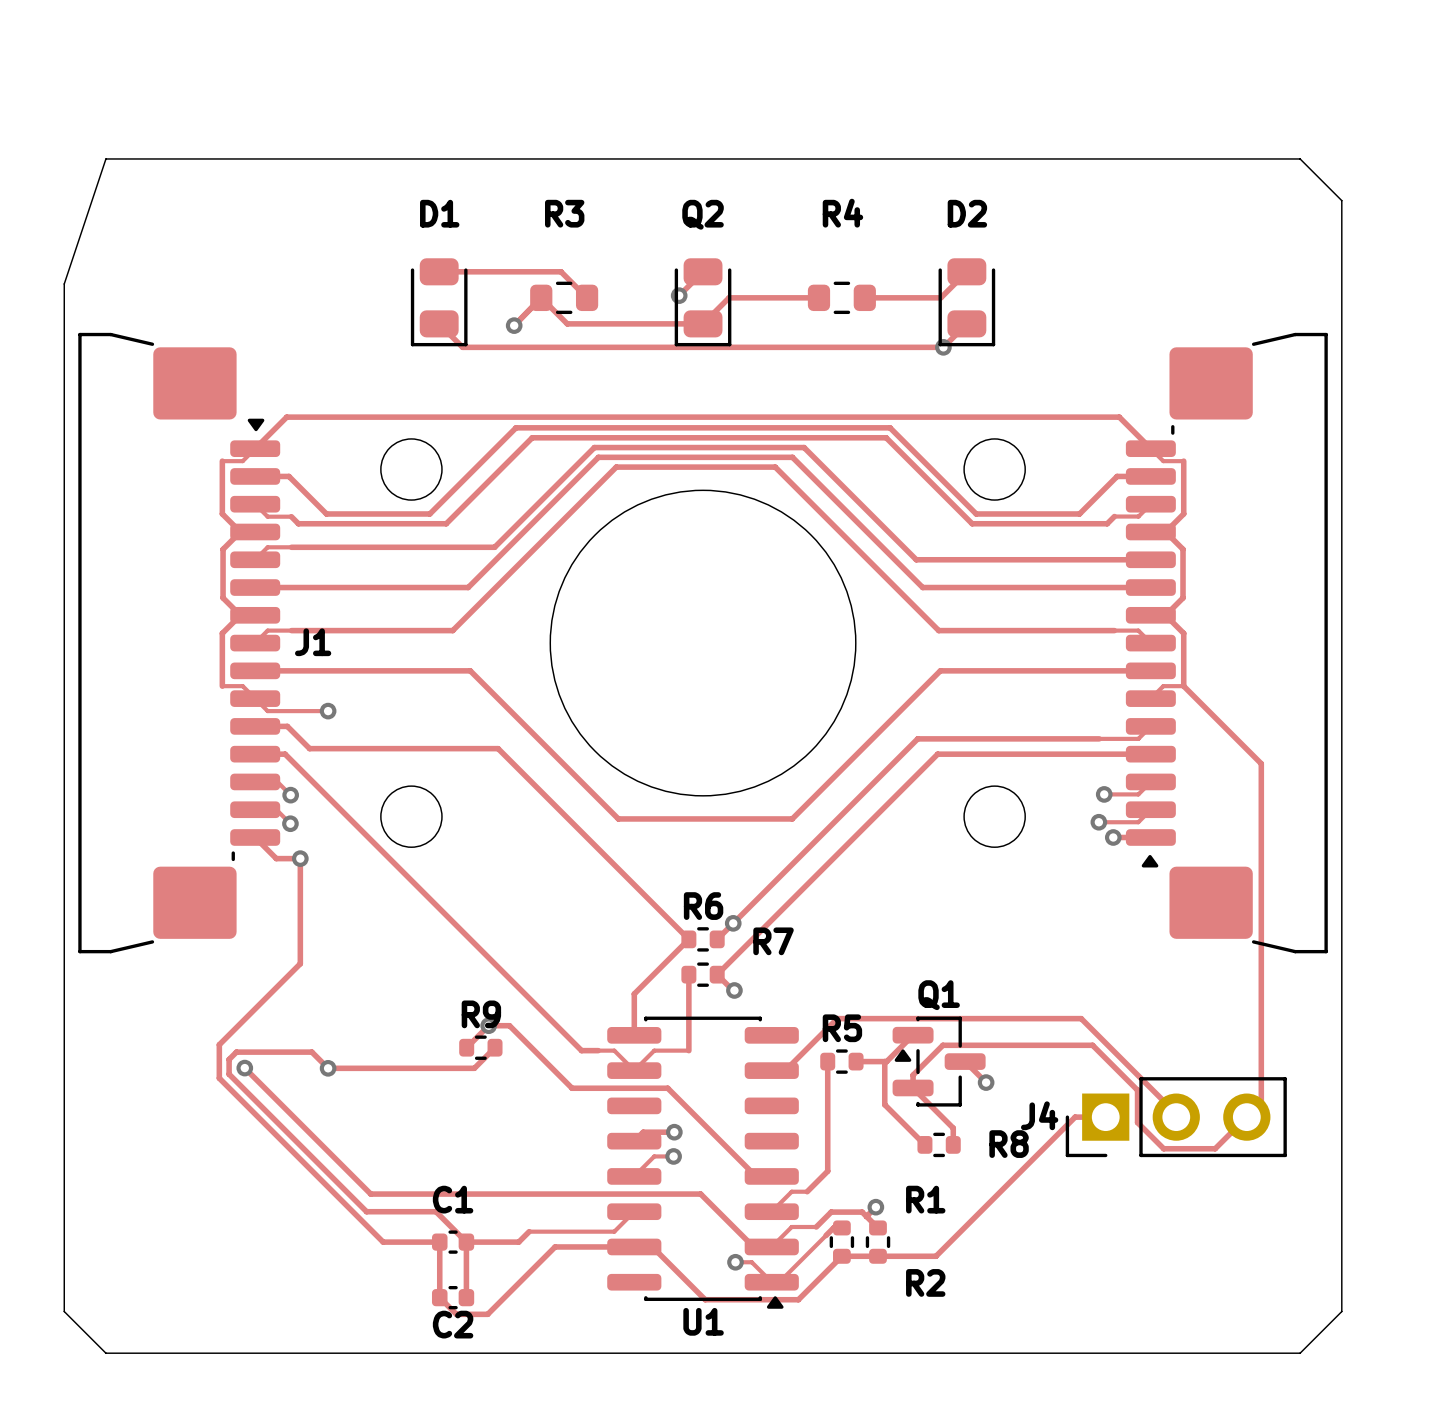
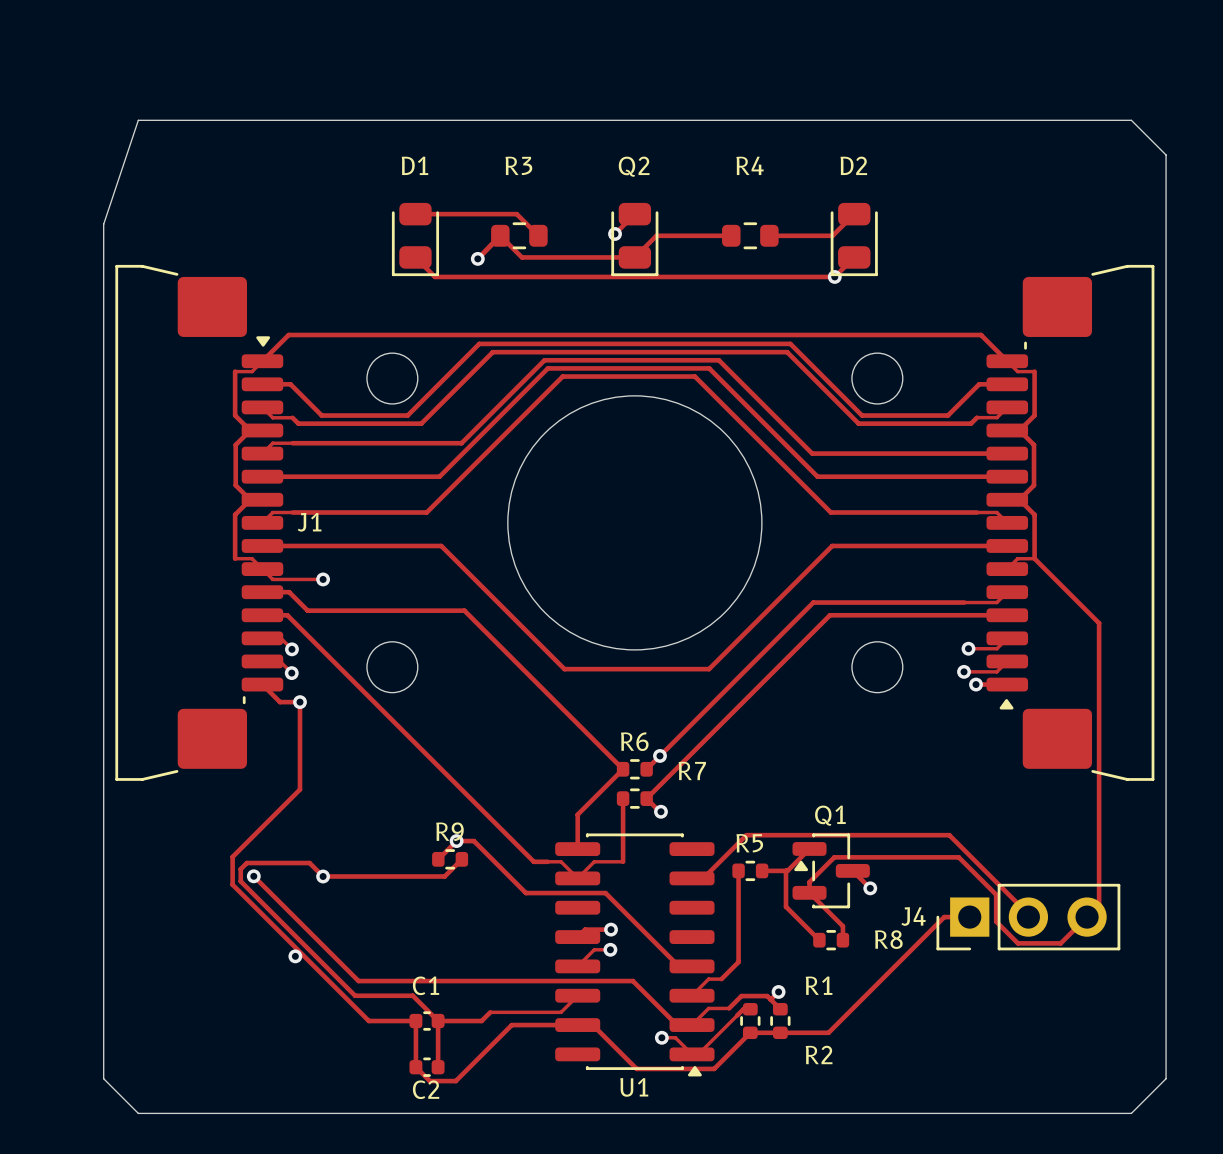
via: none -> (295, 956)

